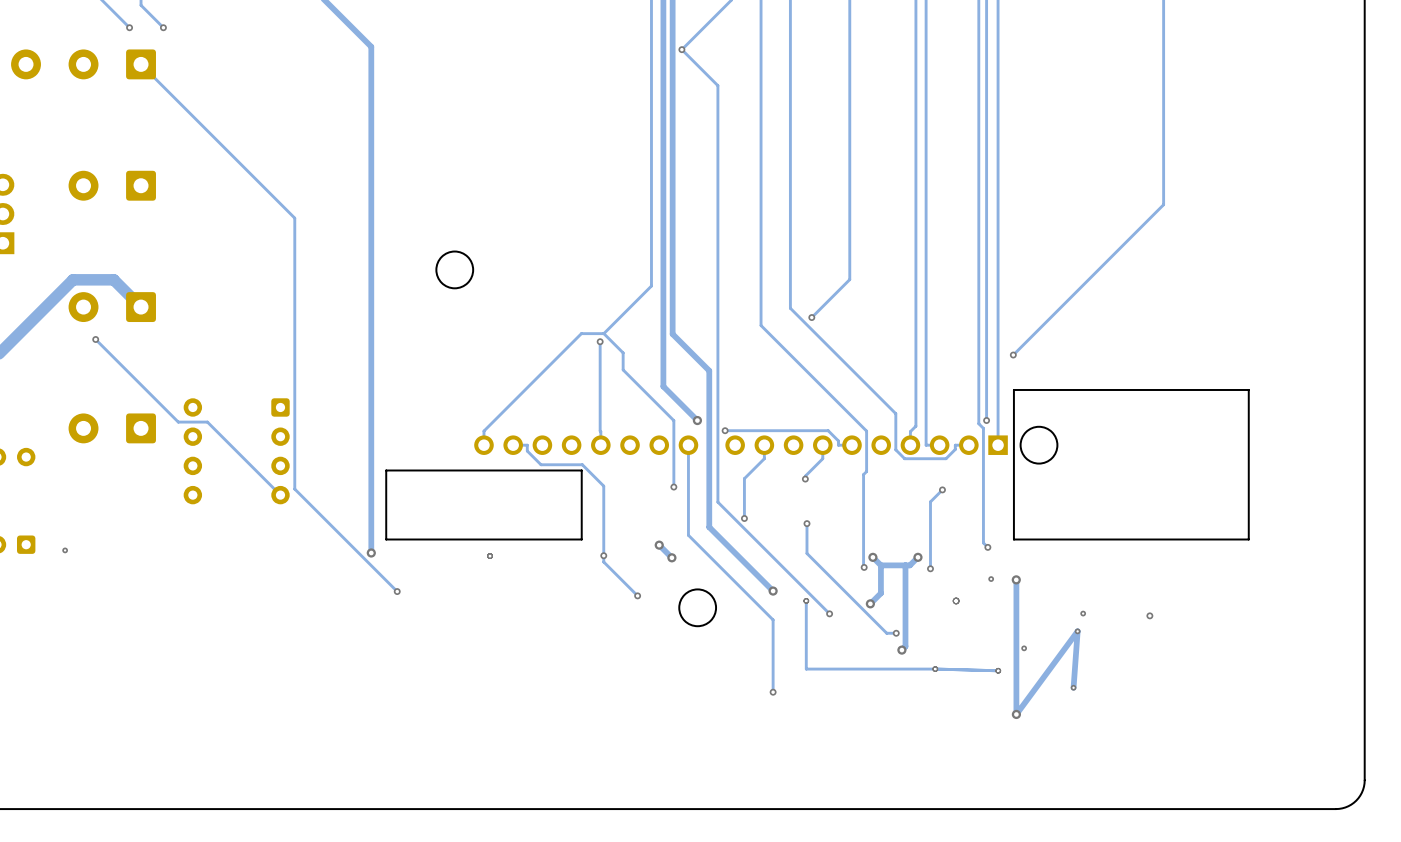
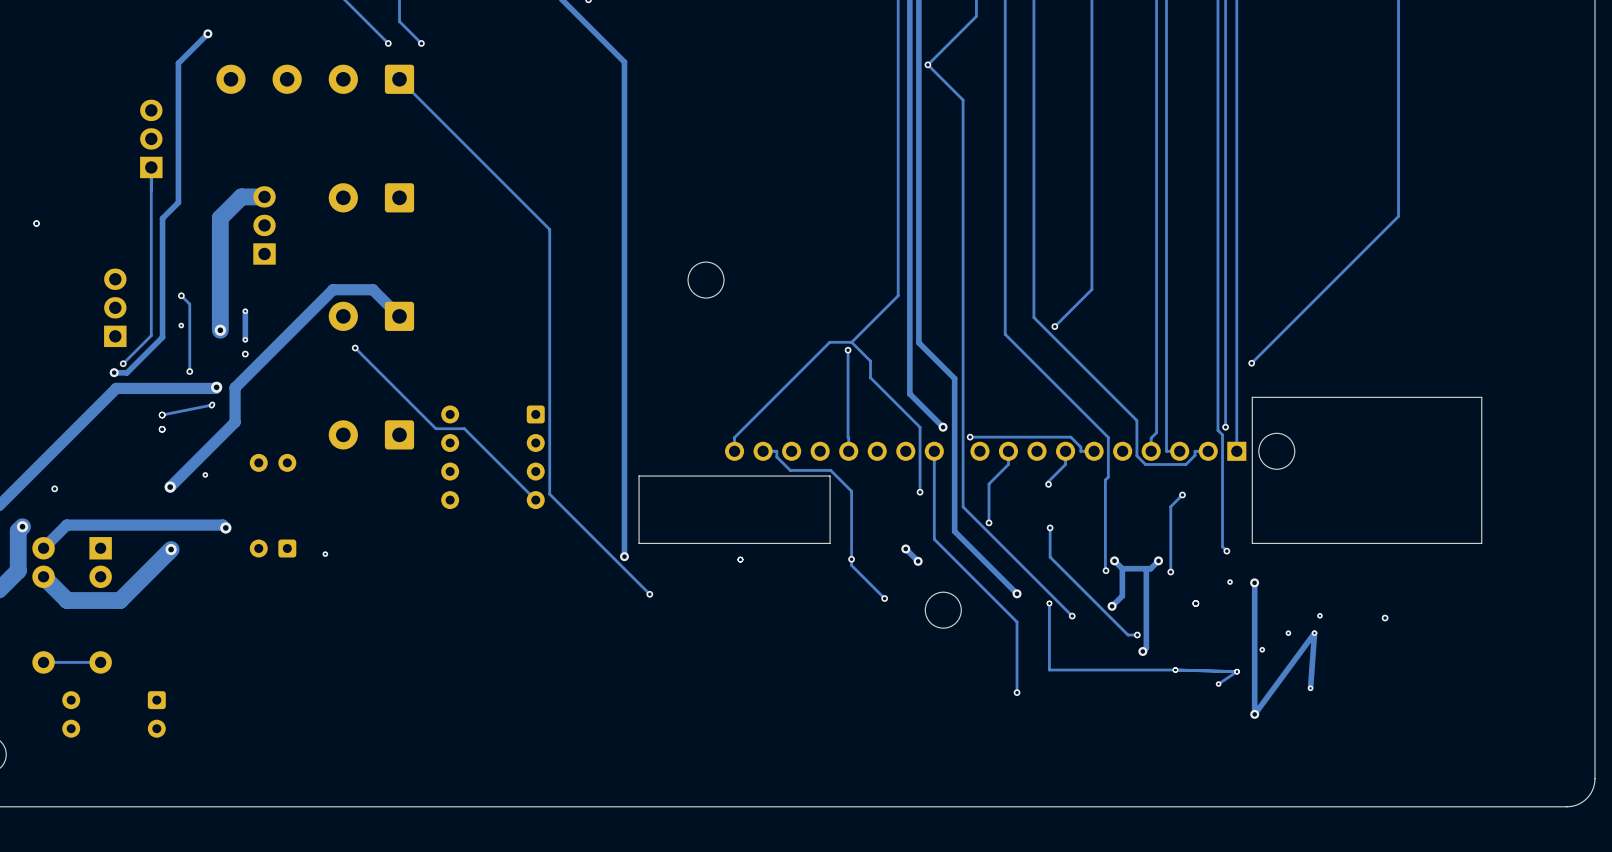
via: none -> (1288, 633)
track: none -> (1236, 671) (1218, 684)
via: none -> (1218, 684)

